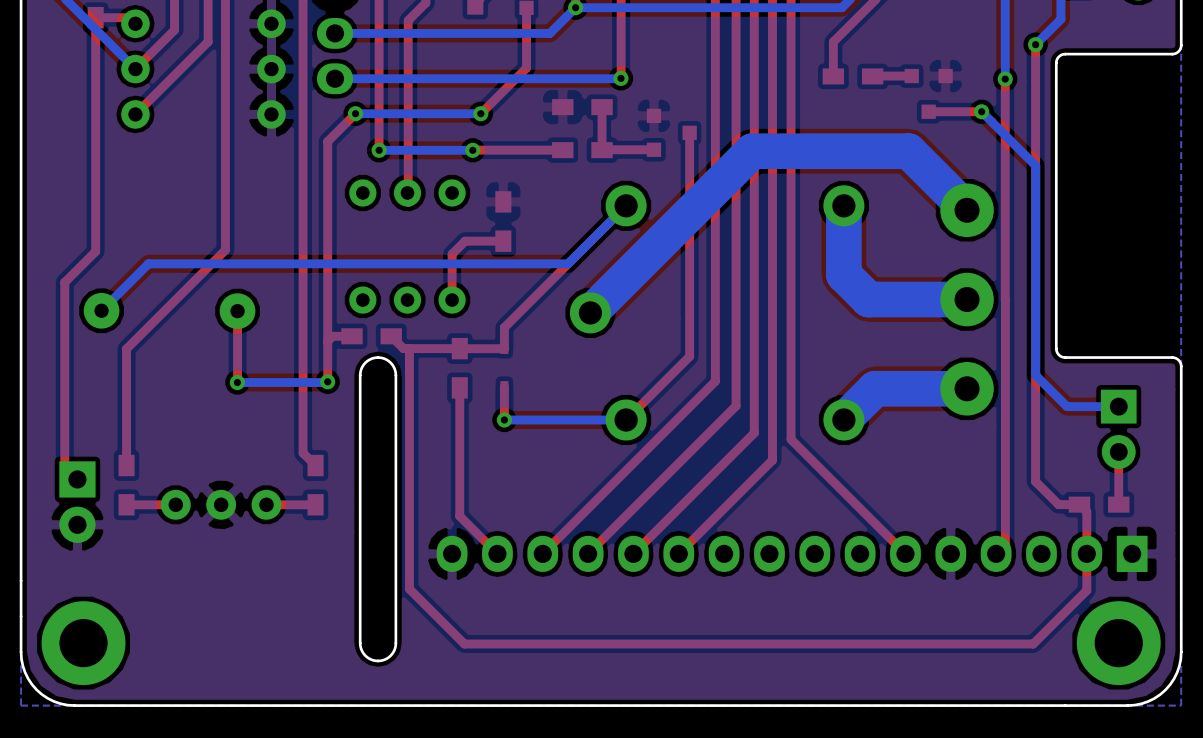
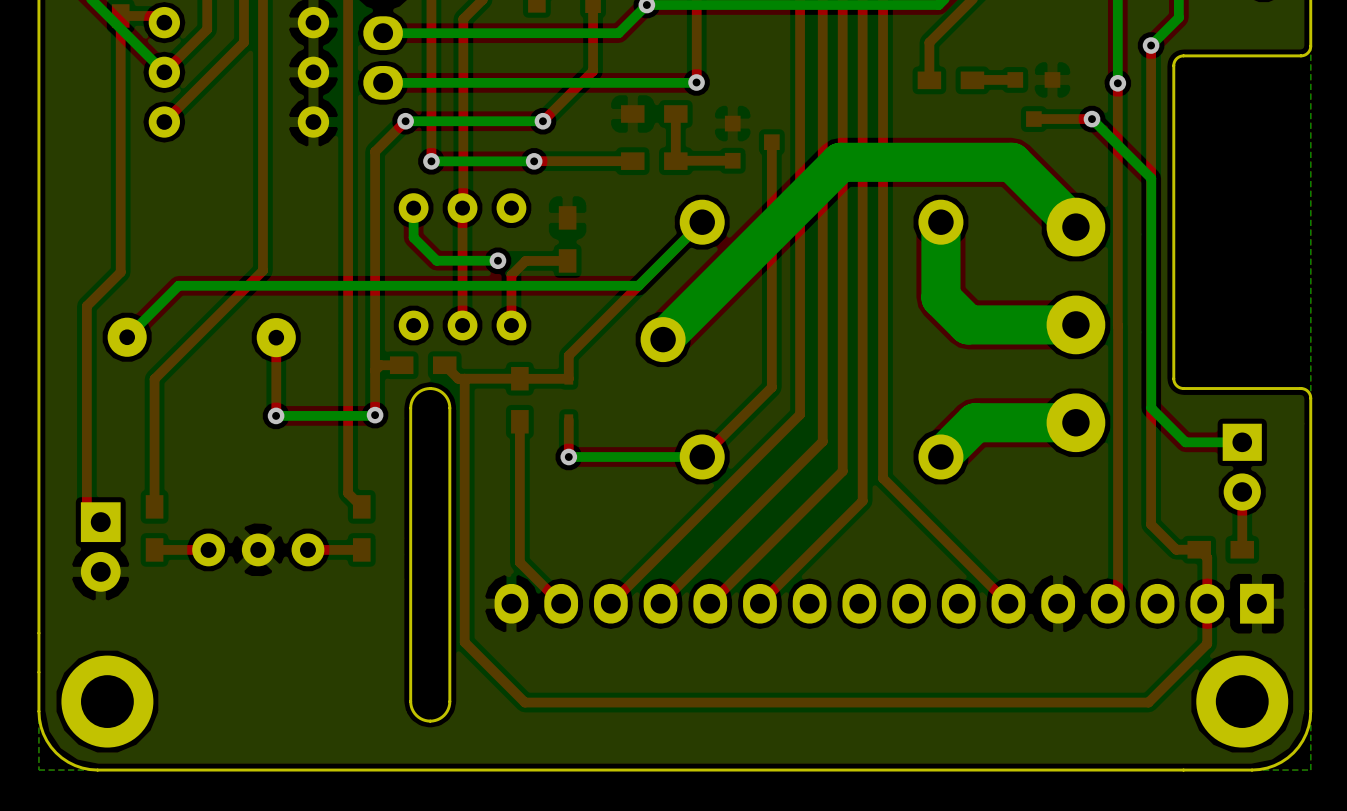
bottom track: none -> (413, 208) (413, 237) (436, 260) (497, 260)
top track: none -> (462, 208) (462, 325)
via: none -> (497, 260)

